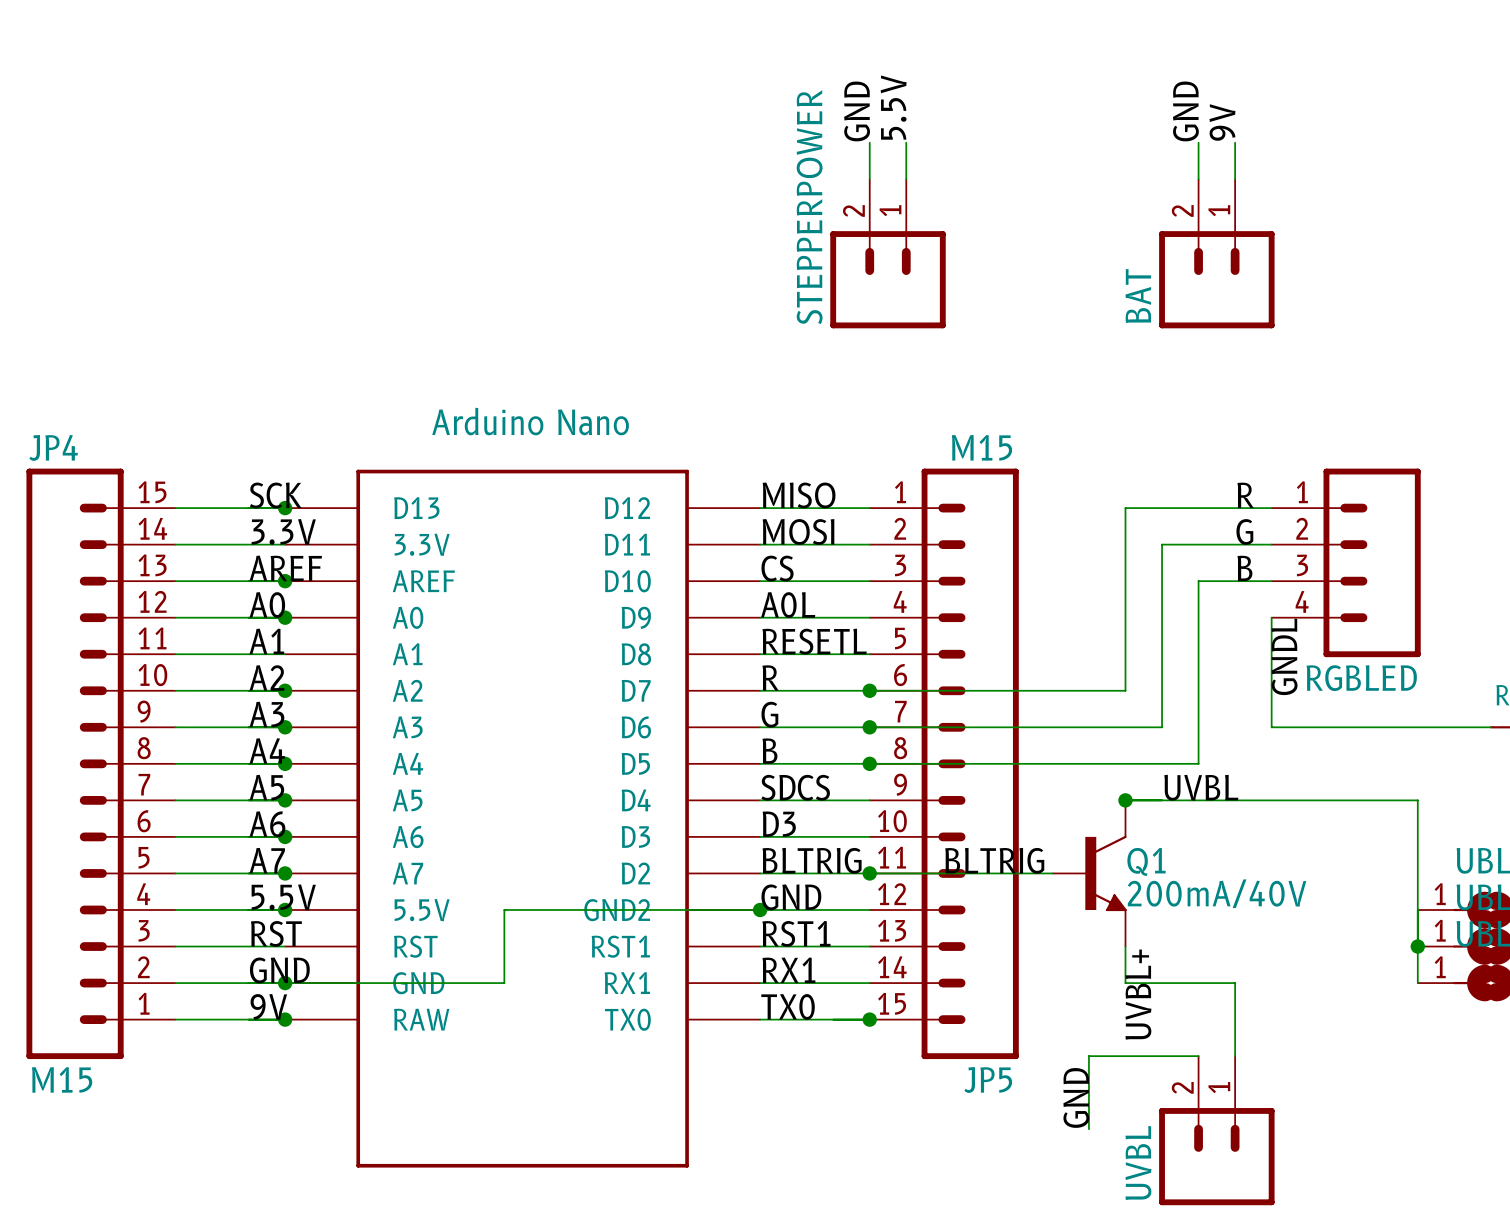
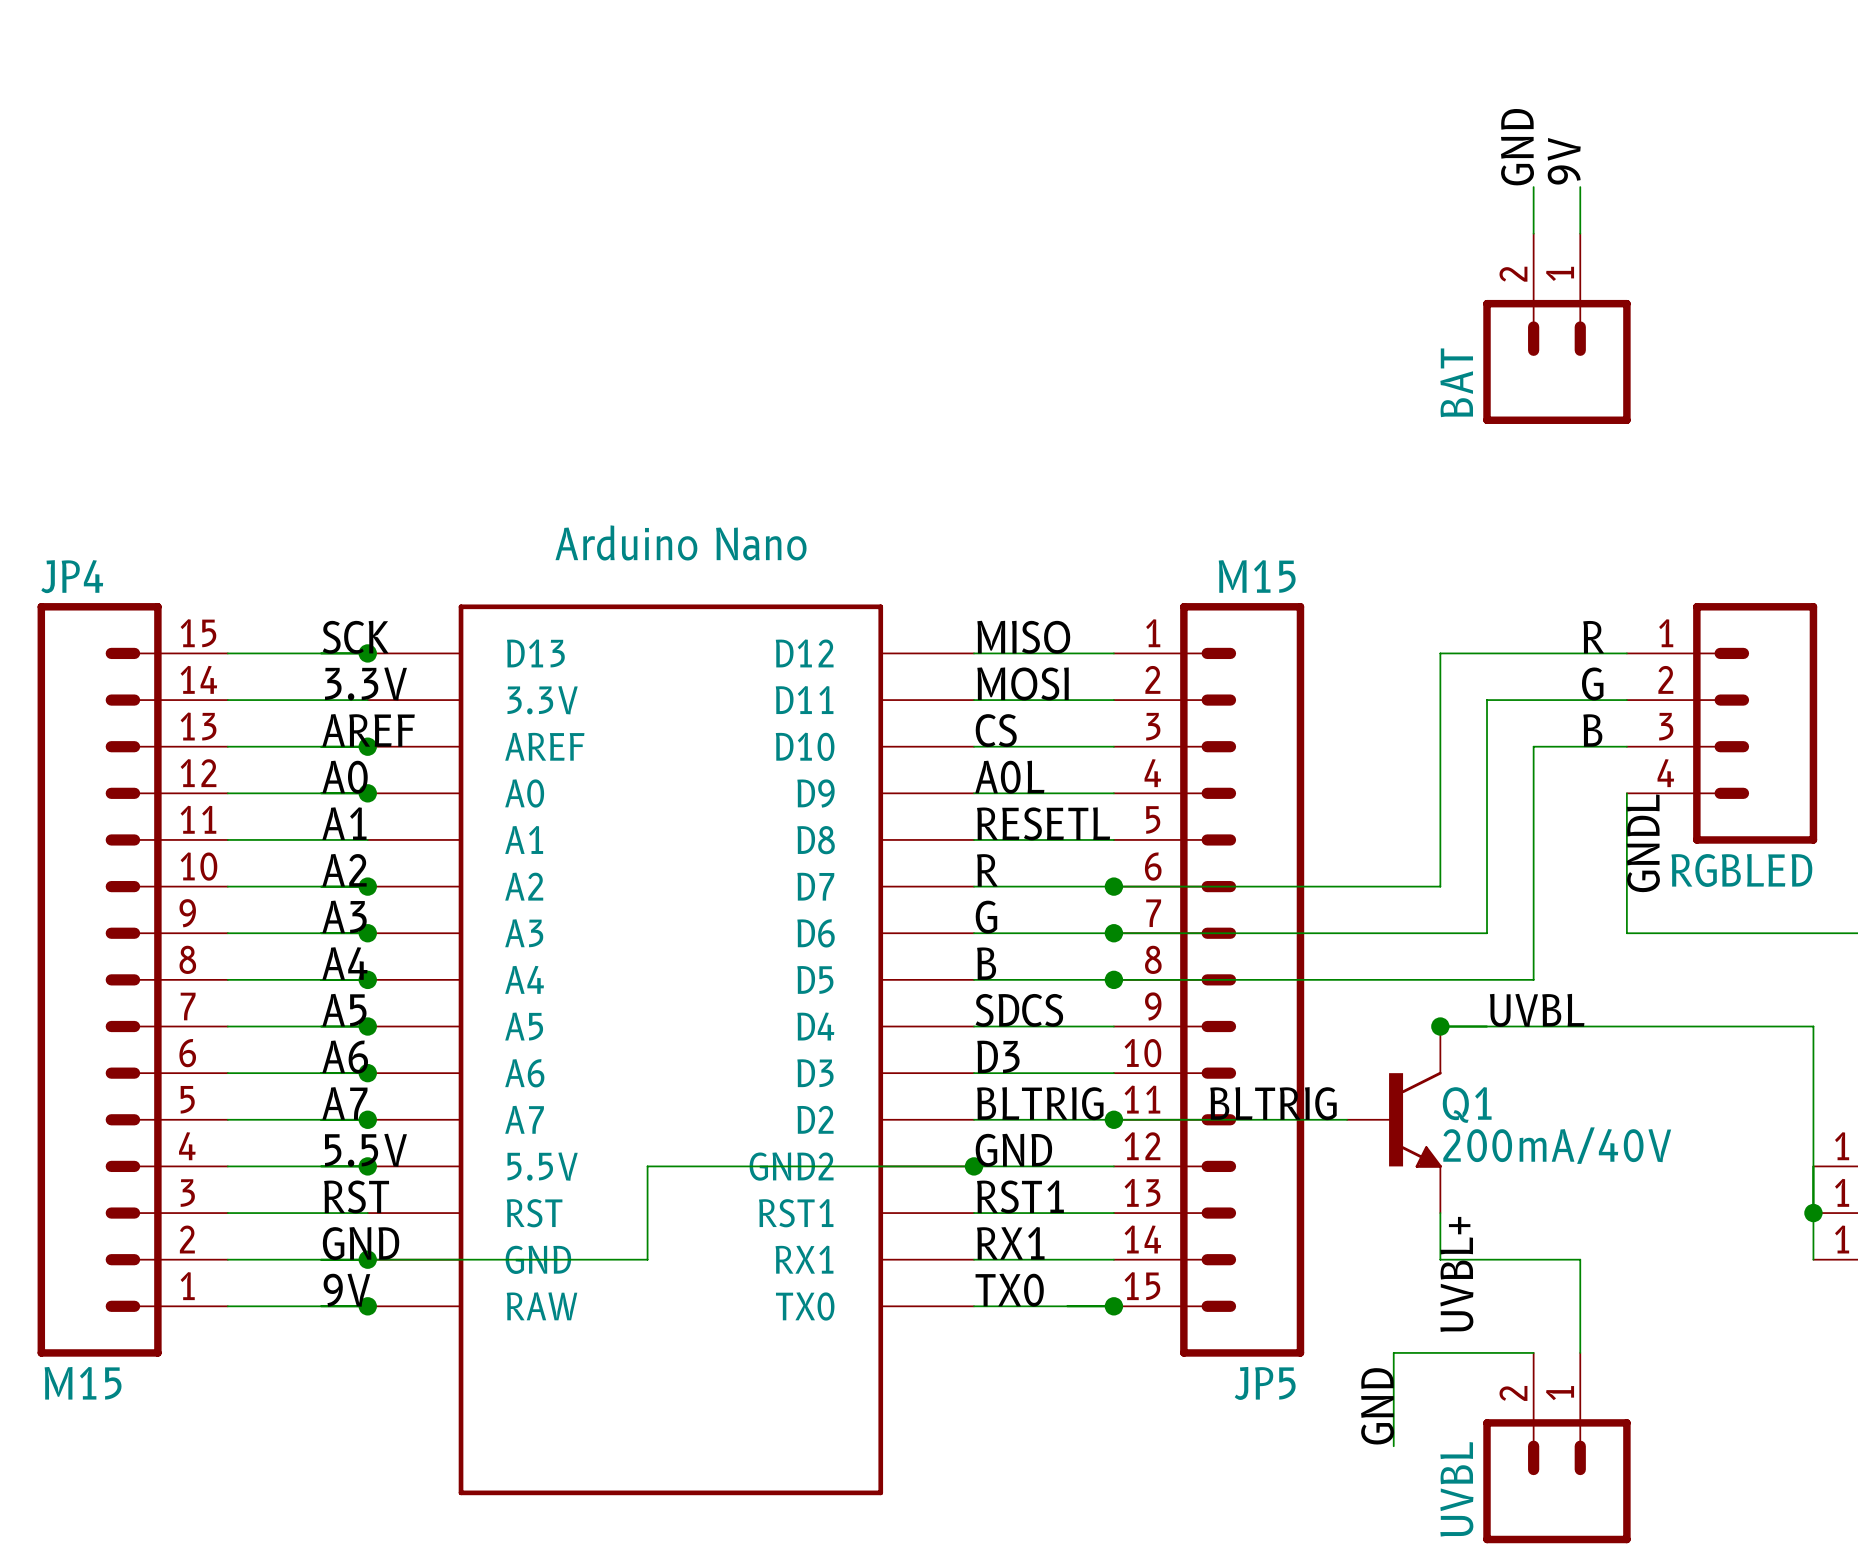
label: 5.5V (893, 107) -> none
label: GND (857, 111) -> none
wire: (869, 142) (869, 179) -> none
wire: (906, 142) (906, 179) -> none
STEPPERPOWER: (888, 253) -> none

